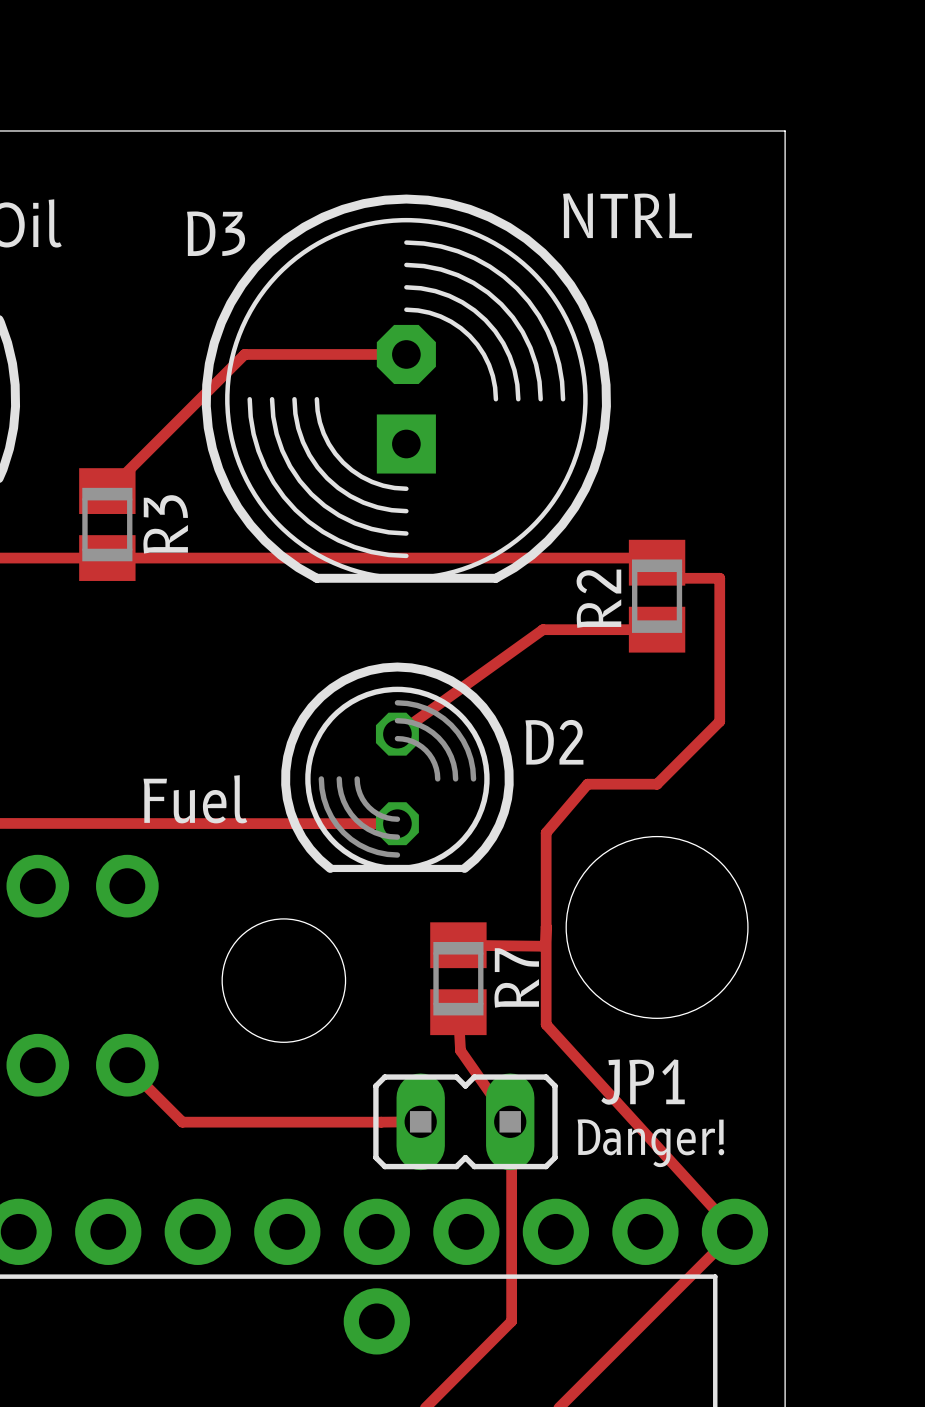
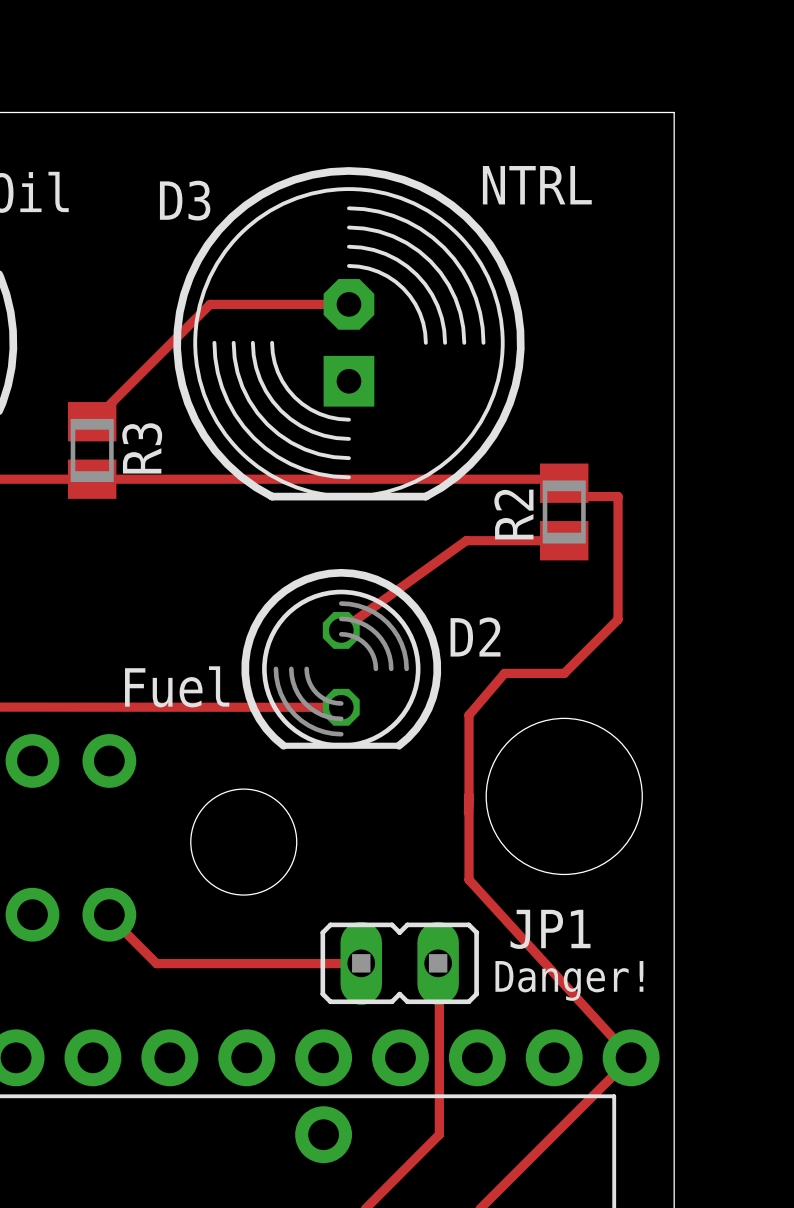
track: (458, 945) (545, 946) -> none
R7: (458, 978) -> none
track: (458, 1012) (460, 1050) (510, 1121) -> none

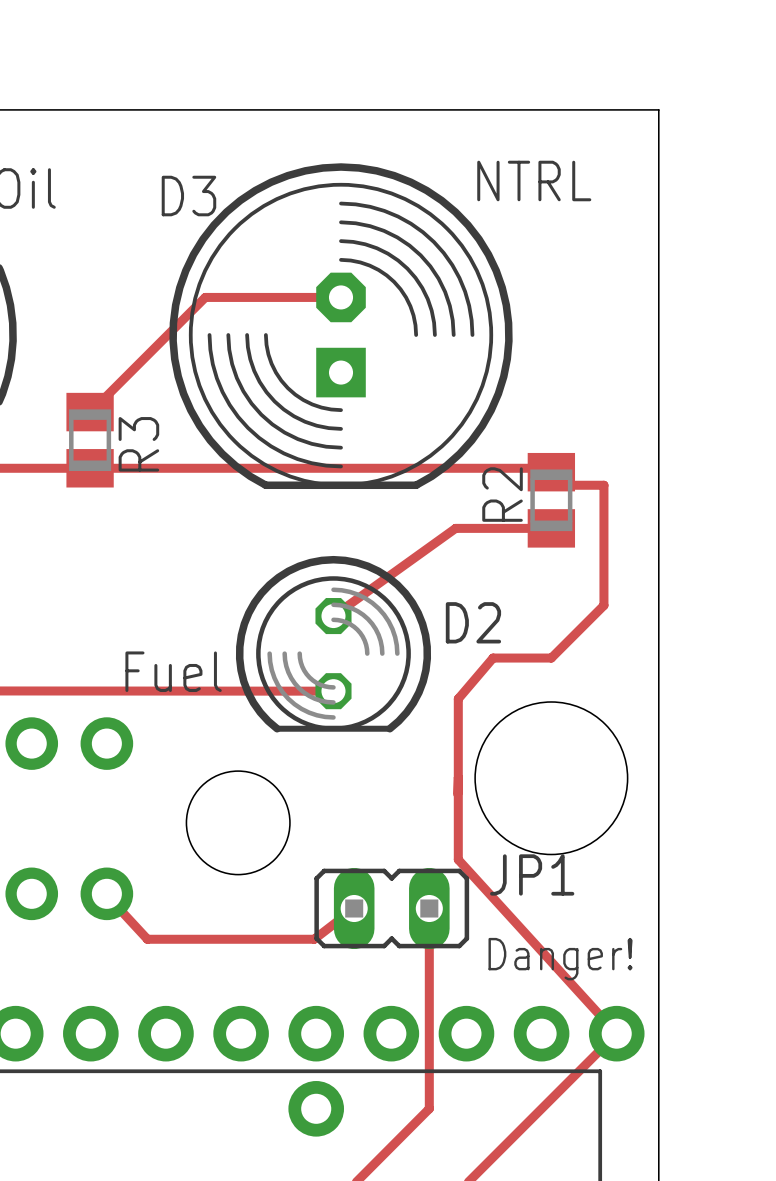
track: (109, 916) (156, 963) (361, 963) -> (106, 895) (147, 939) (314, 939) (354, 908)
JP1 position: (399, 963) -> (391, 908)

